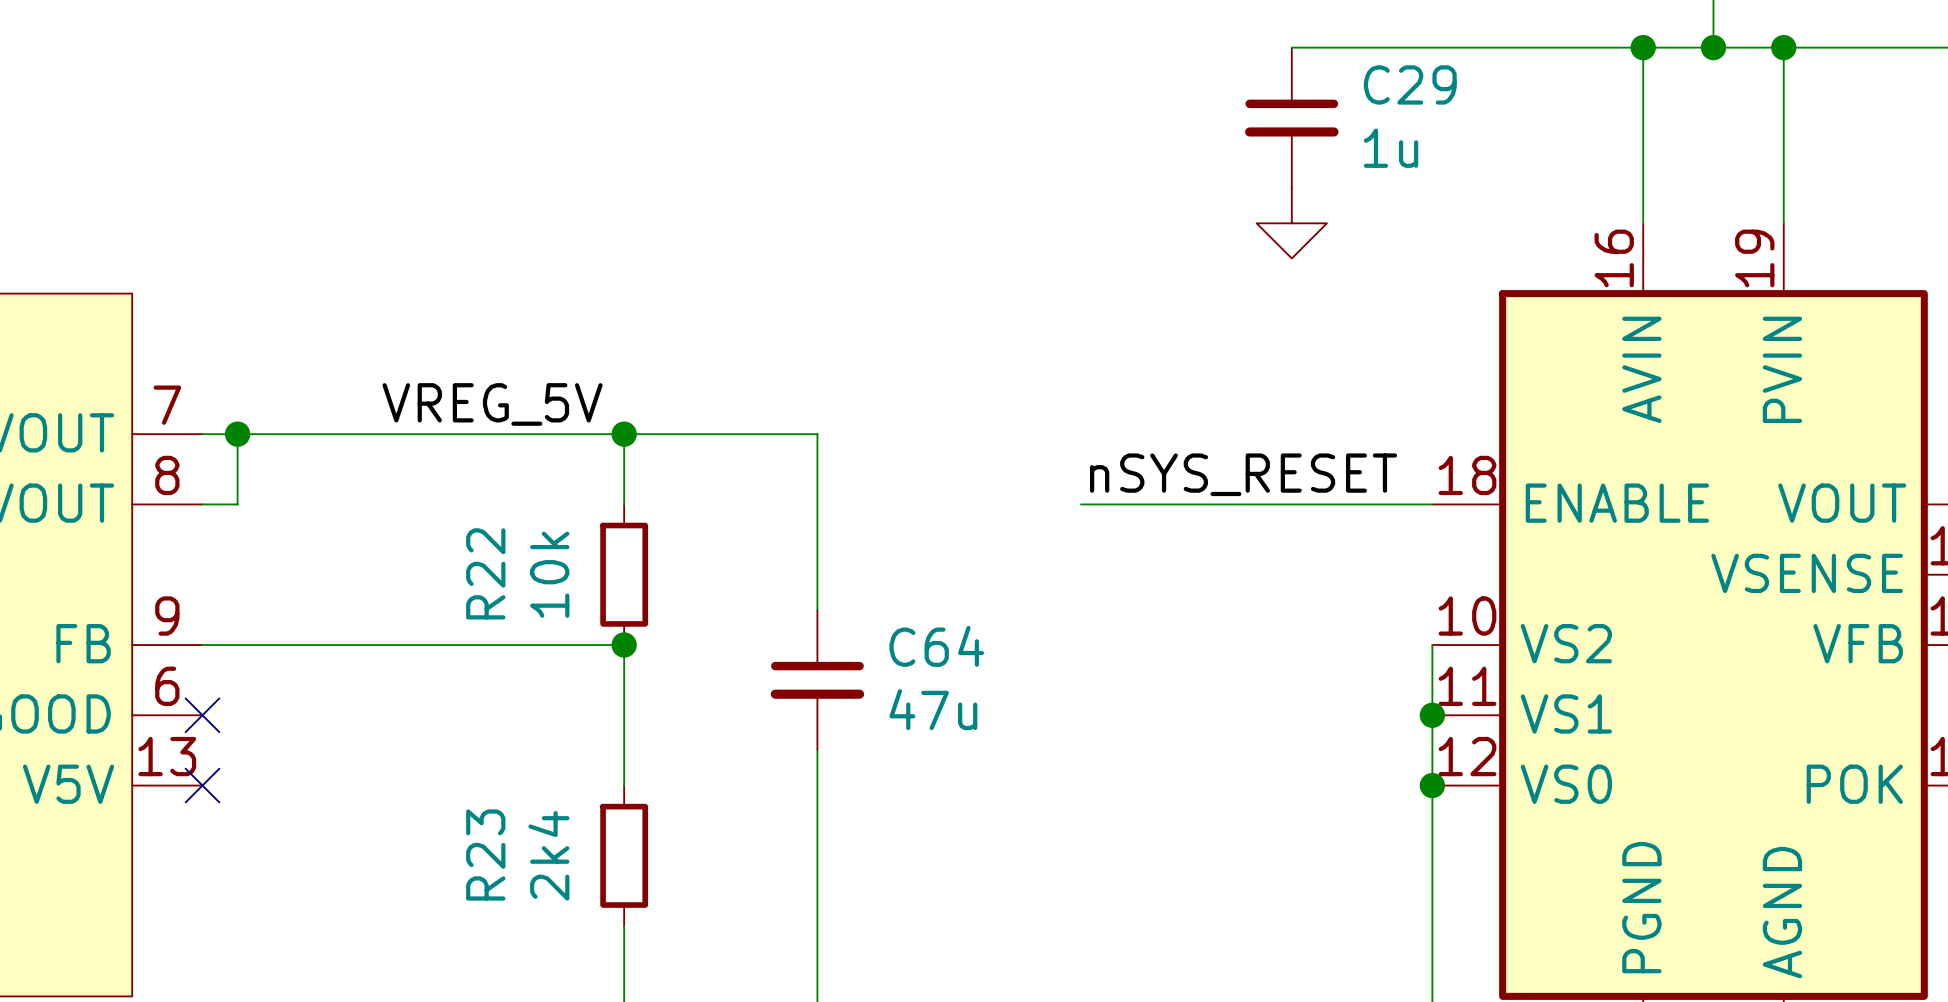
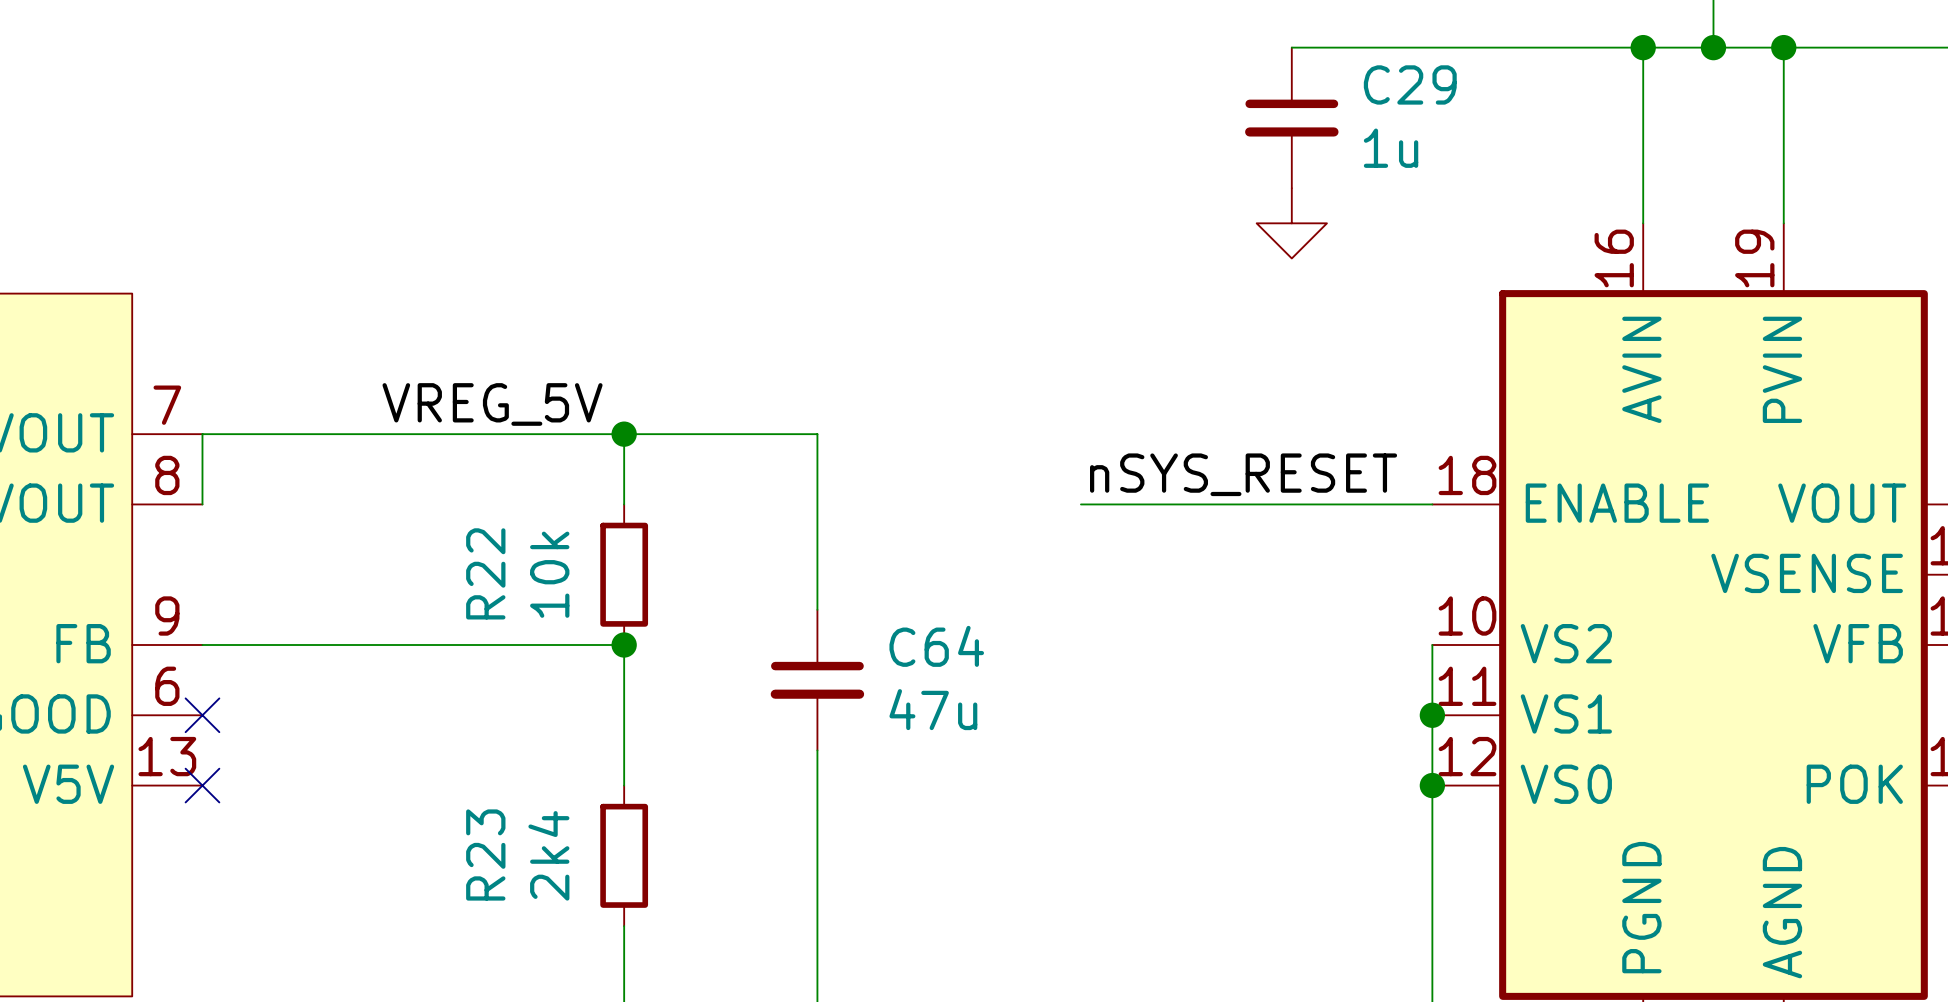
wire: (237, 434) (237, 504) (202, 504) -> (202, 434) (202, 504)
junction: (237, 434) -> none

